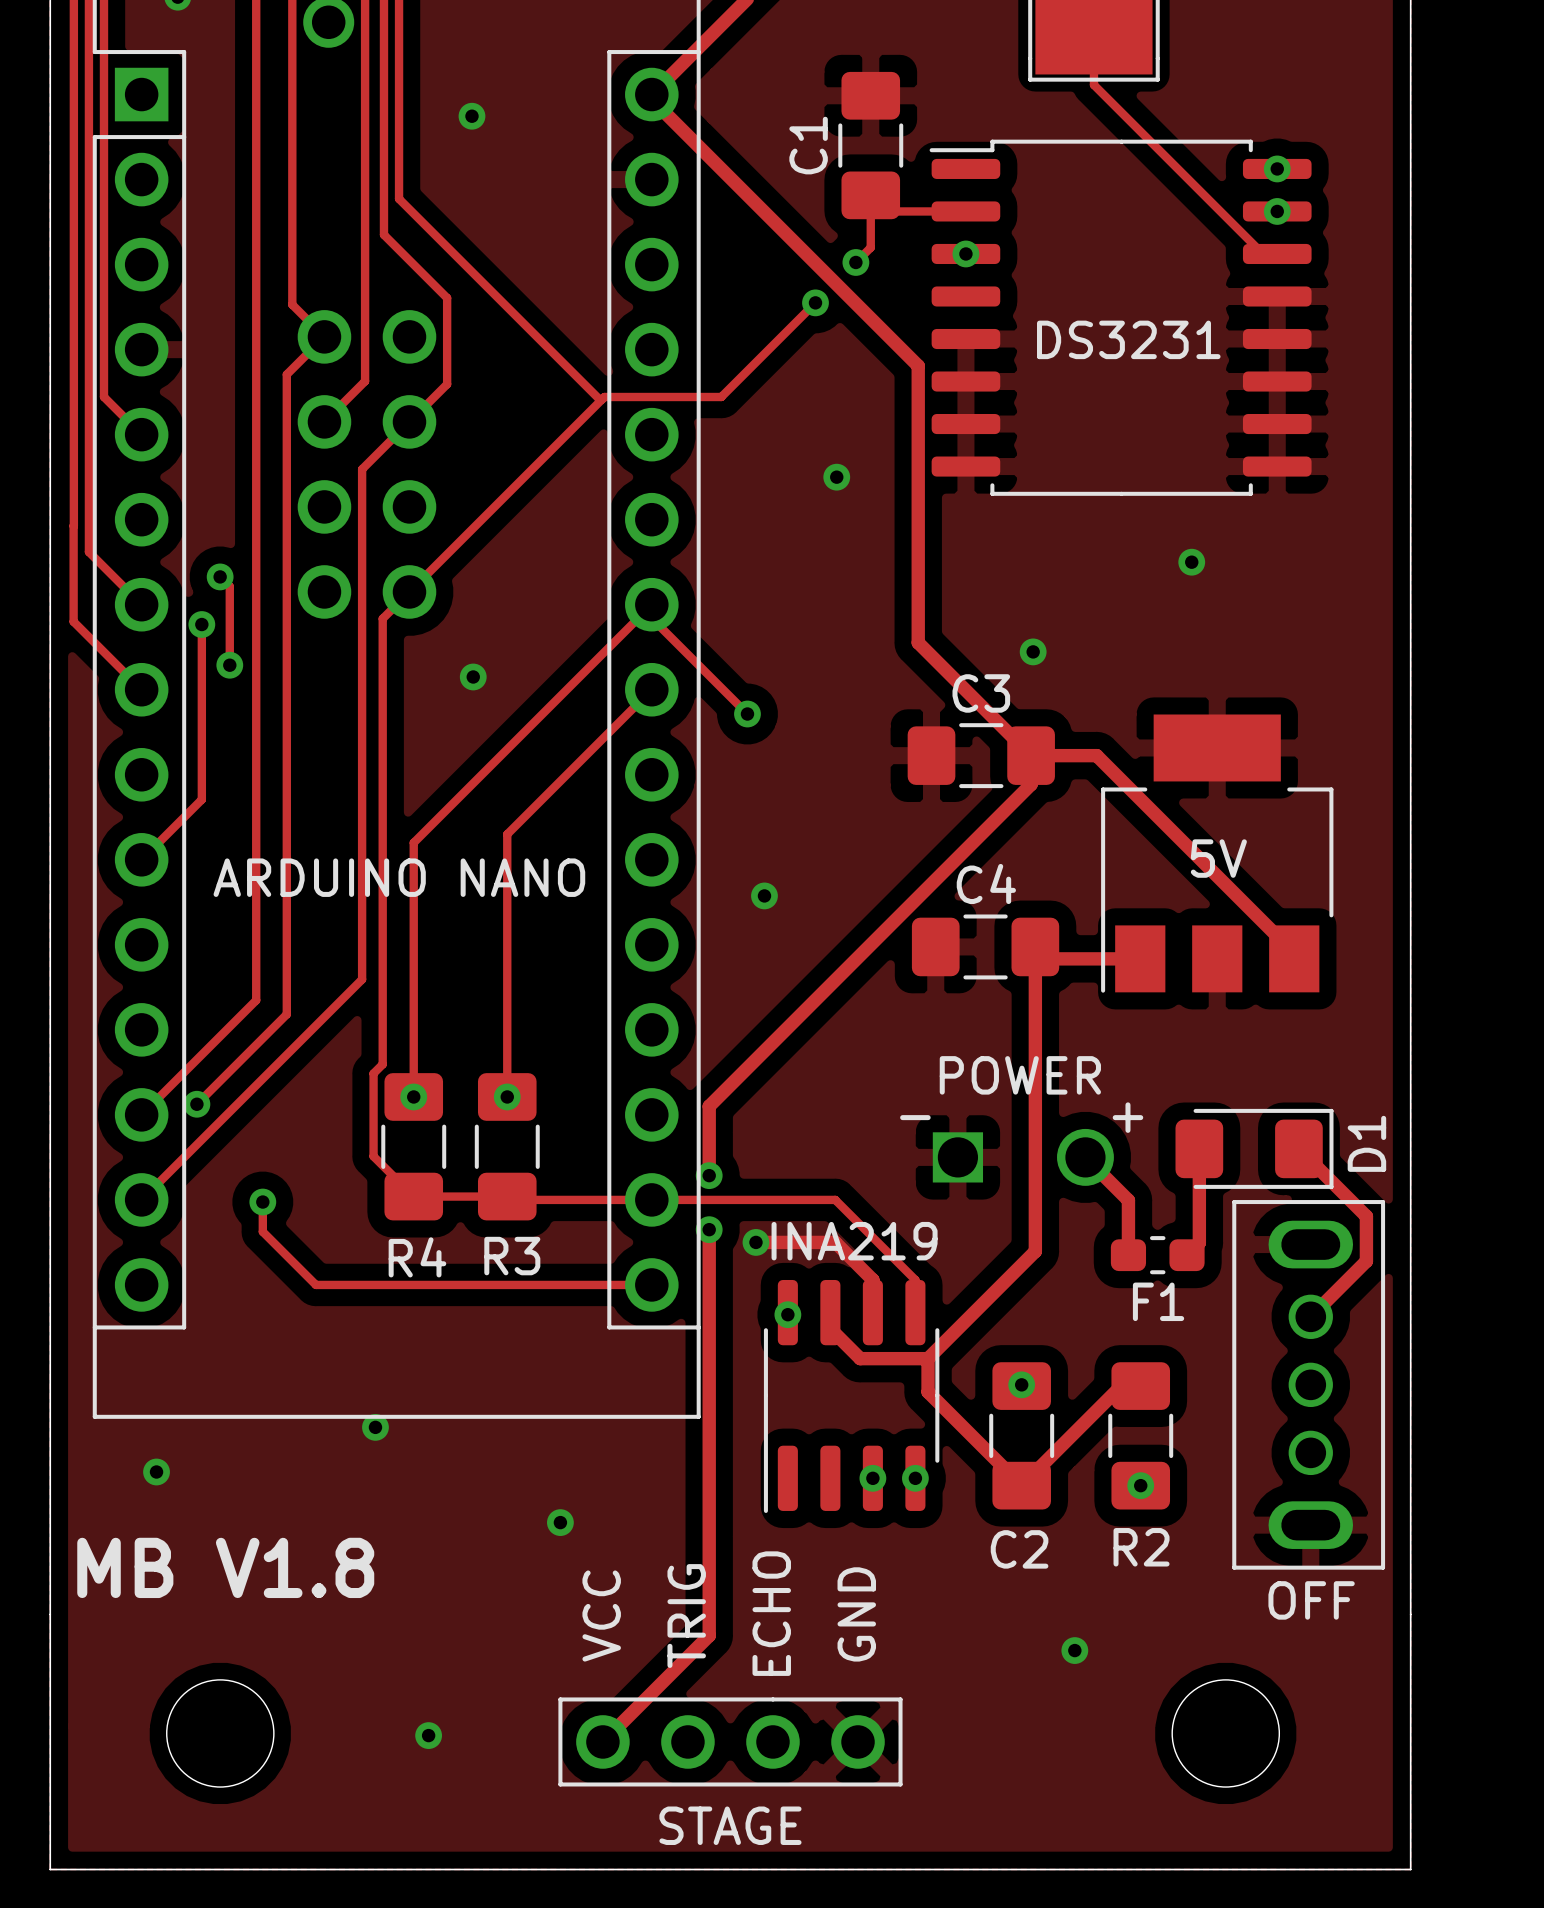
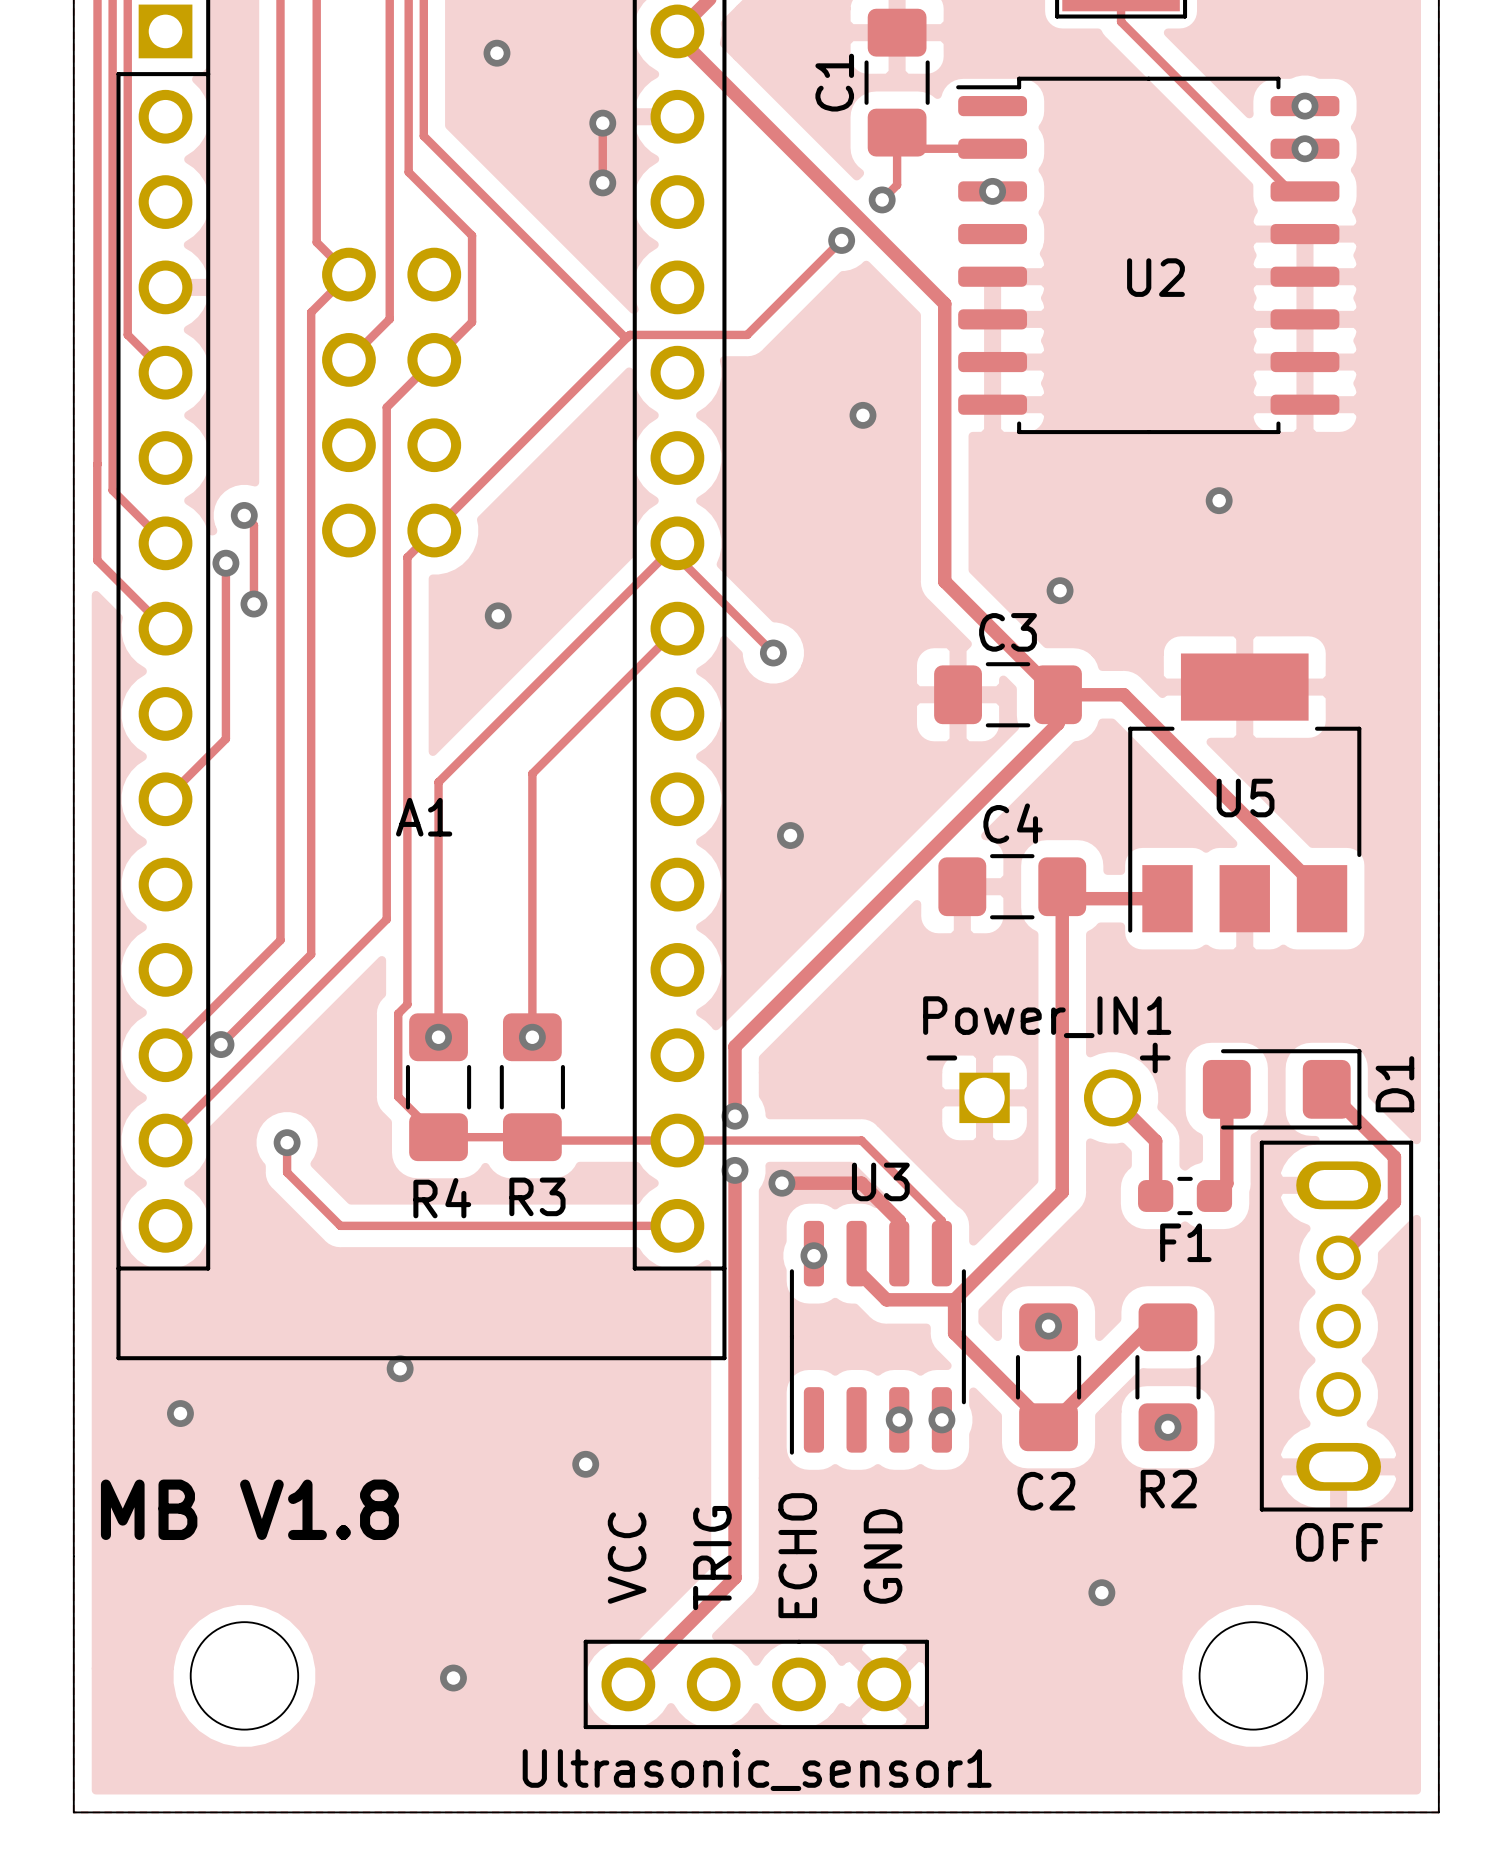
track: none -> (602, 123) (602, 182)
via: none -> (602, 123)
via: none -> (602, 182)
DS3231 name: DS3231 (1128, 339) -> U2 (1155, 277)
5V name: 5V (1218, 858) -> U5 (1245, 798)
ARDUINO NANO name: ARDUINO NANO (399, 877) -> A1 (424, 817)
POWER name: POWER (1020, 1075) -> Power_IN1 (1047, 1017)
INA219 name: INA219 (854, 1241) -> U3 (880, 1181)
STAGE name: STAGE (730, 1825) -> Ultrasonic_sensor1 (757, 1770)

